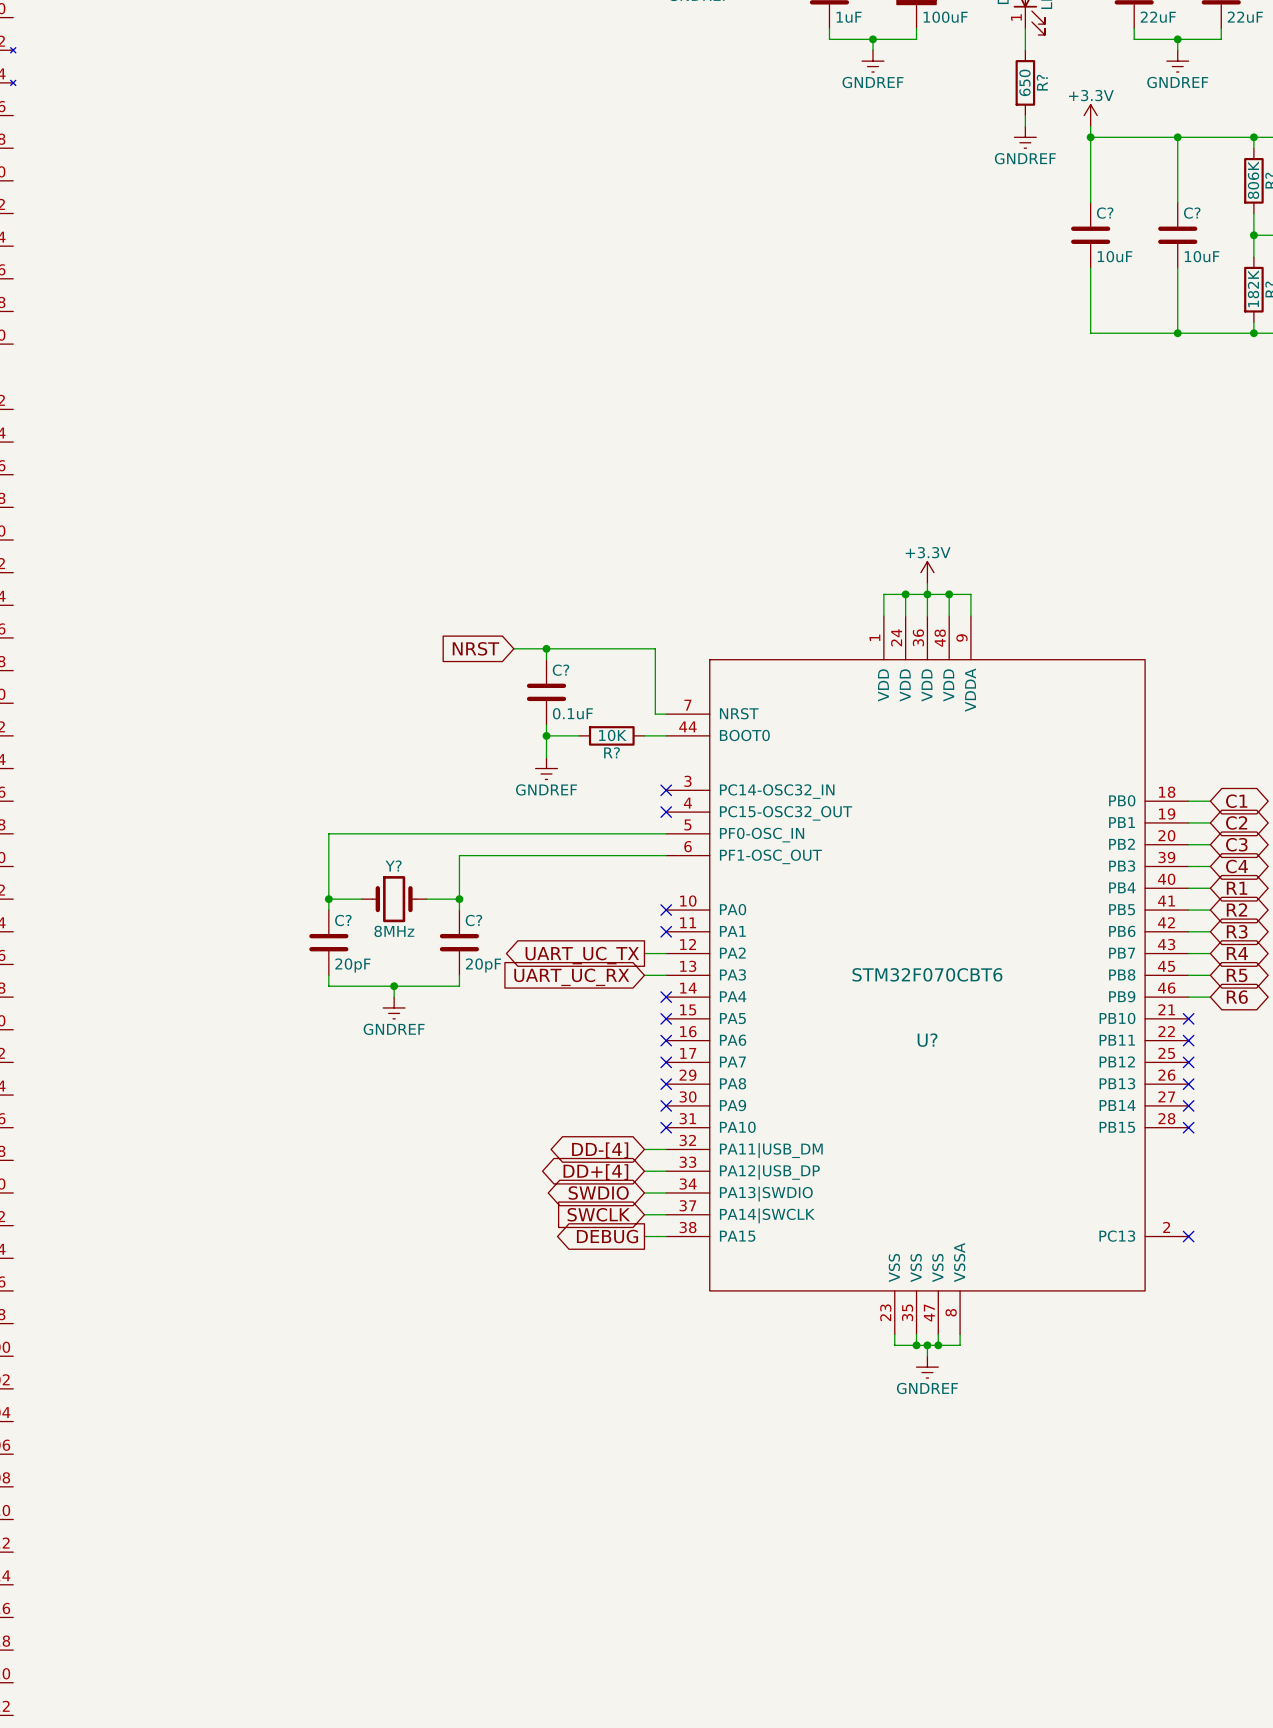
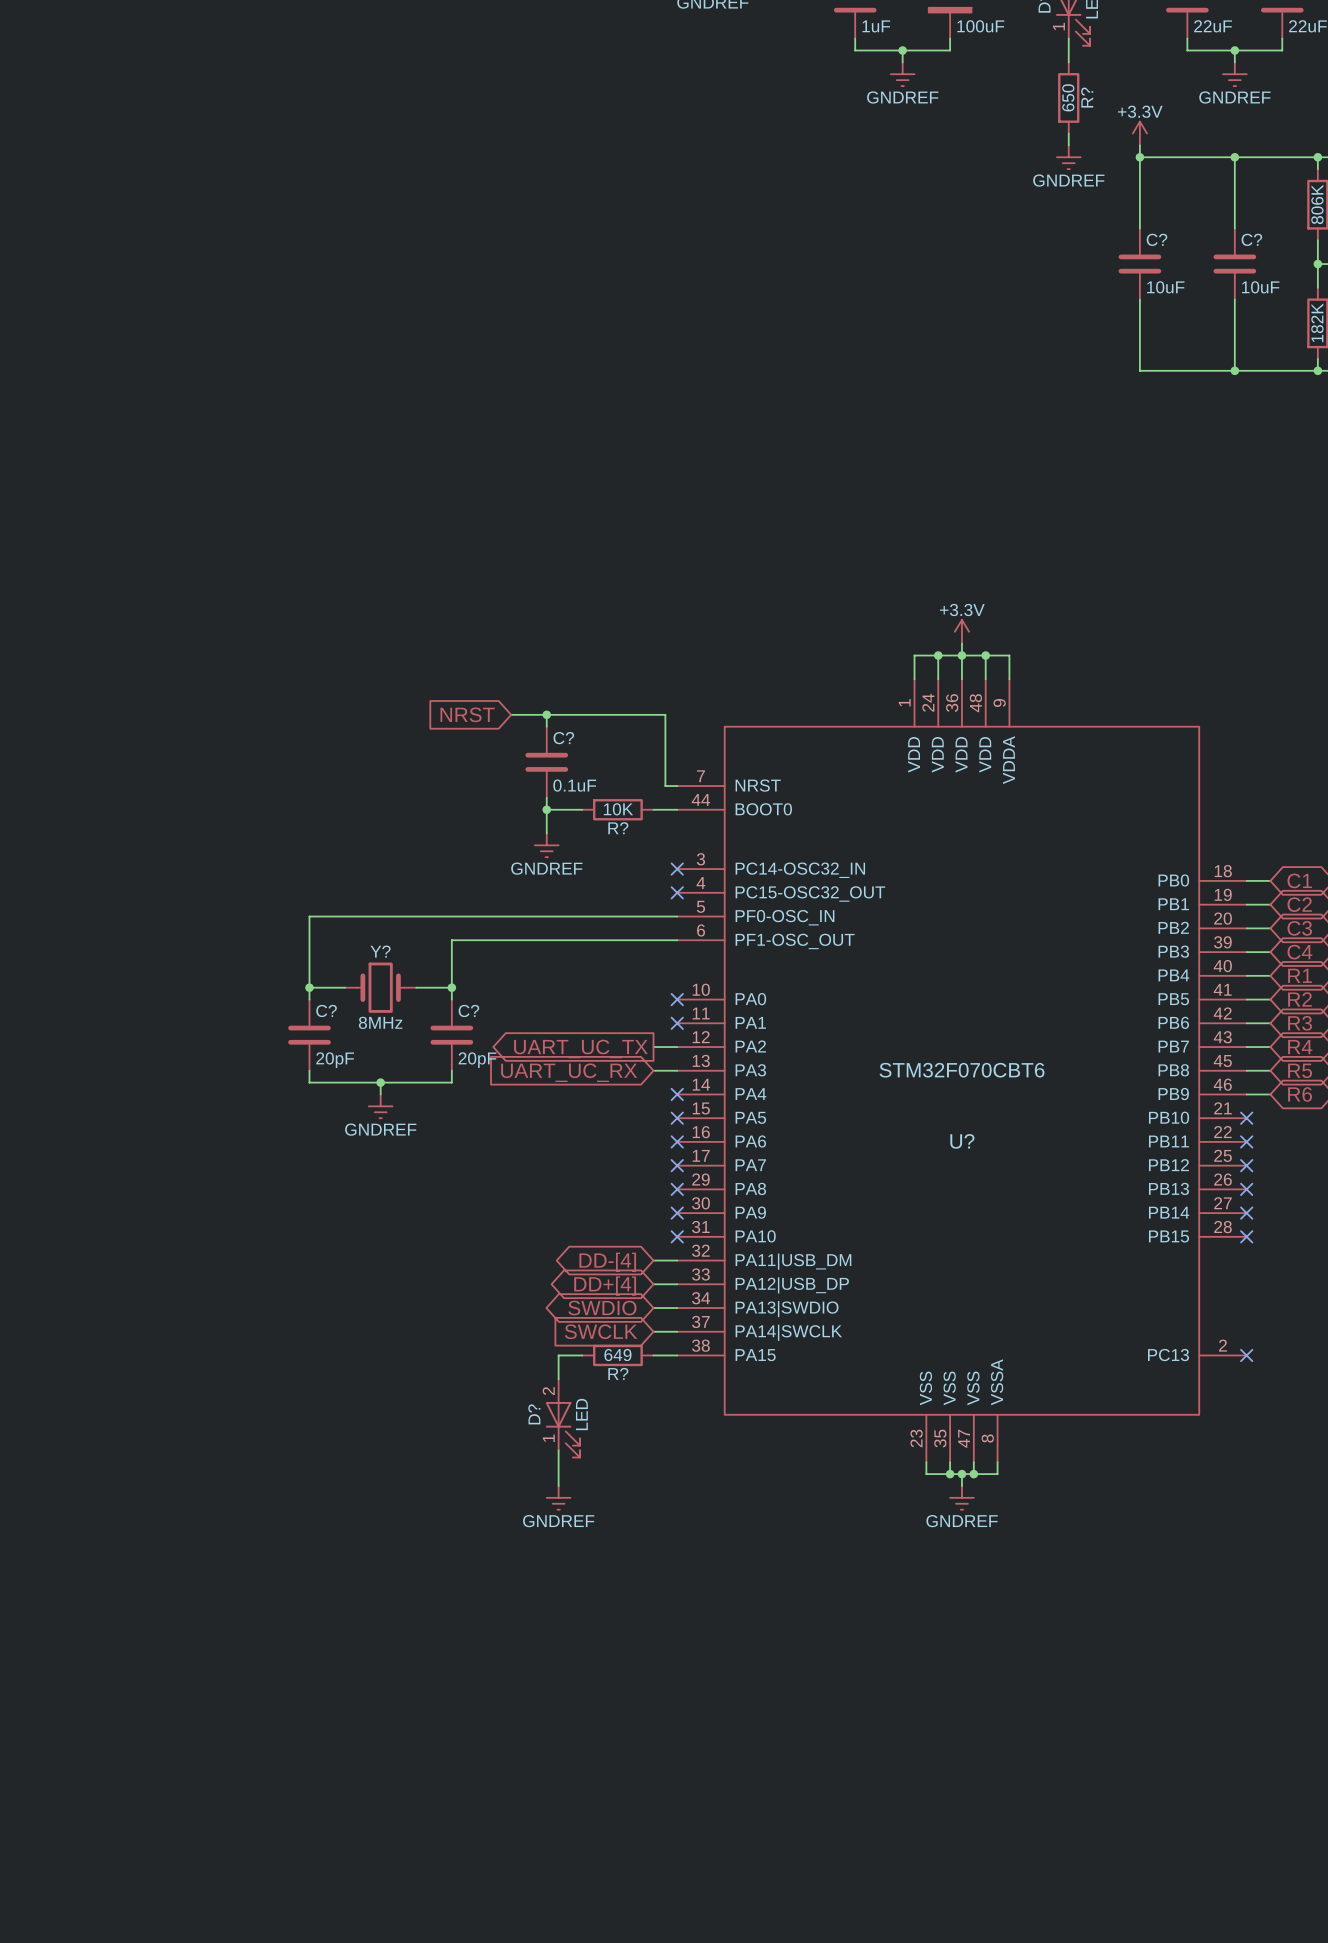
wire: none -> (582, 1355) (558, 1355) (558, 1379)
global label: DEBUG (607, 1236) -> none
R?: none -> 649 (617, 1355)
D?: none -> LED (562, 1418)
wire: none -> (558, 1450) (558, 1485)
power symbol: none -> GNDREF (558, 1497)

